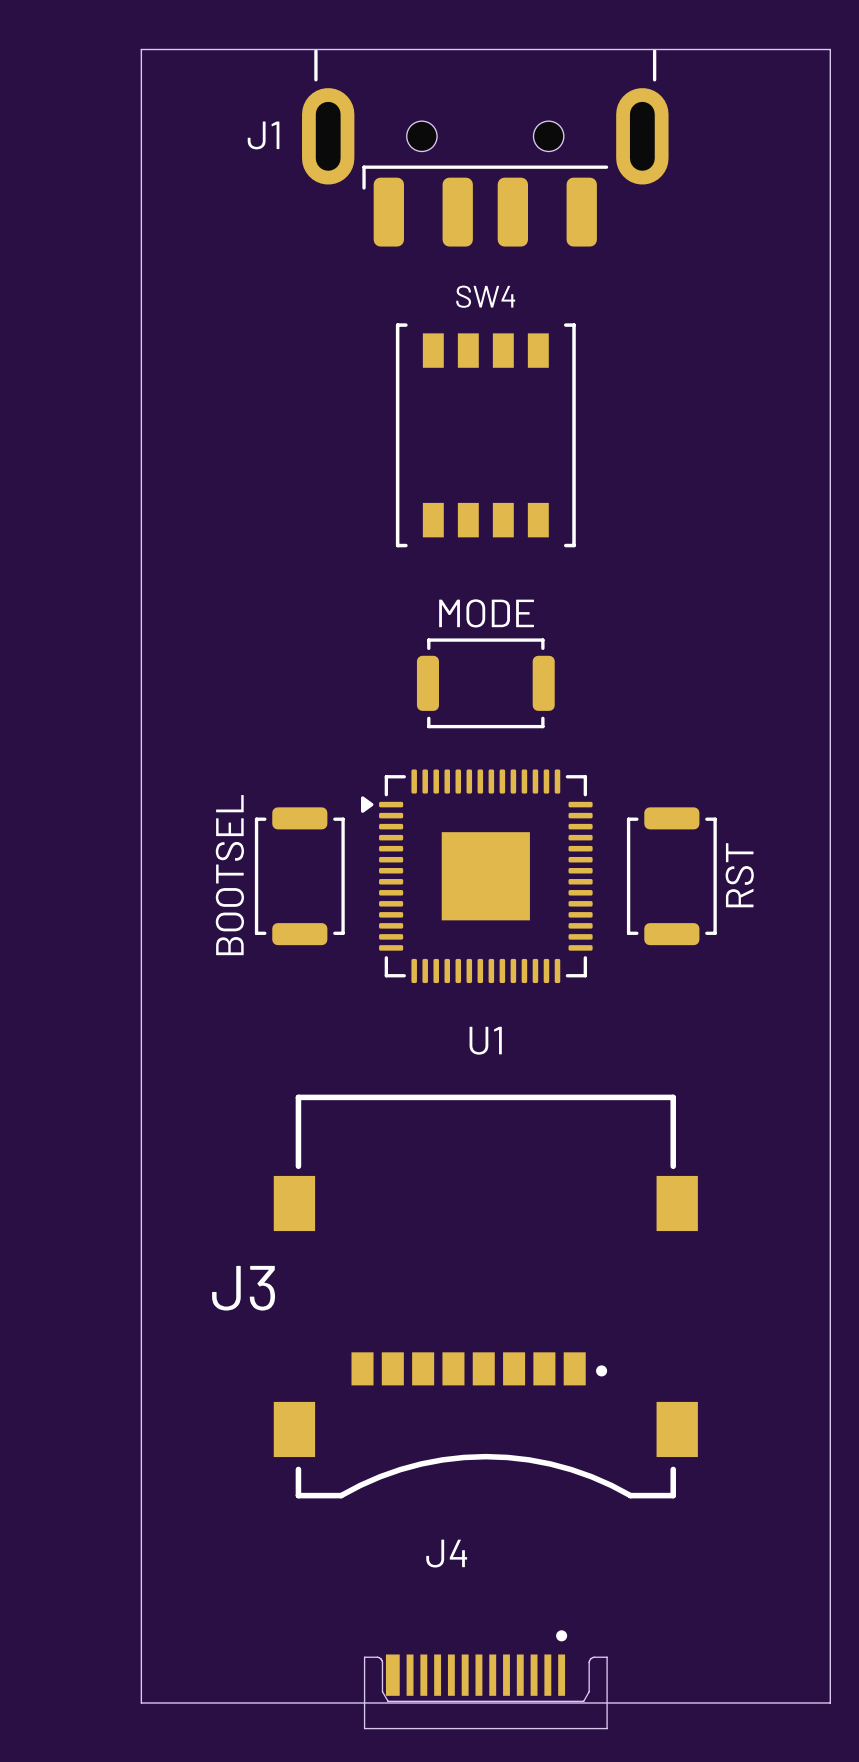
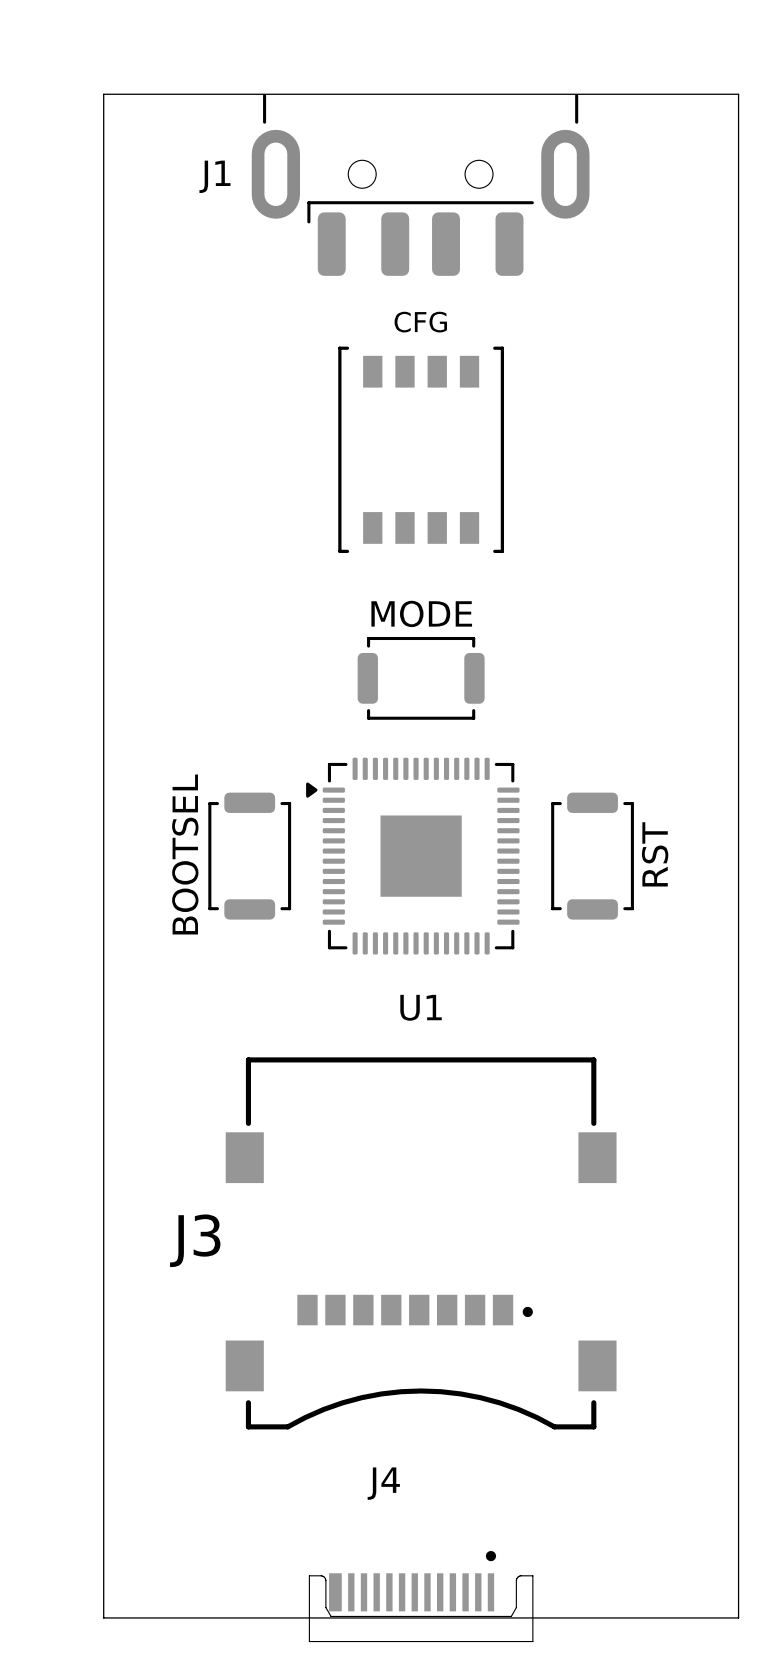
SW4 name: SW4 (485, 296) -> CFG (420, 322)

